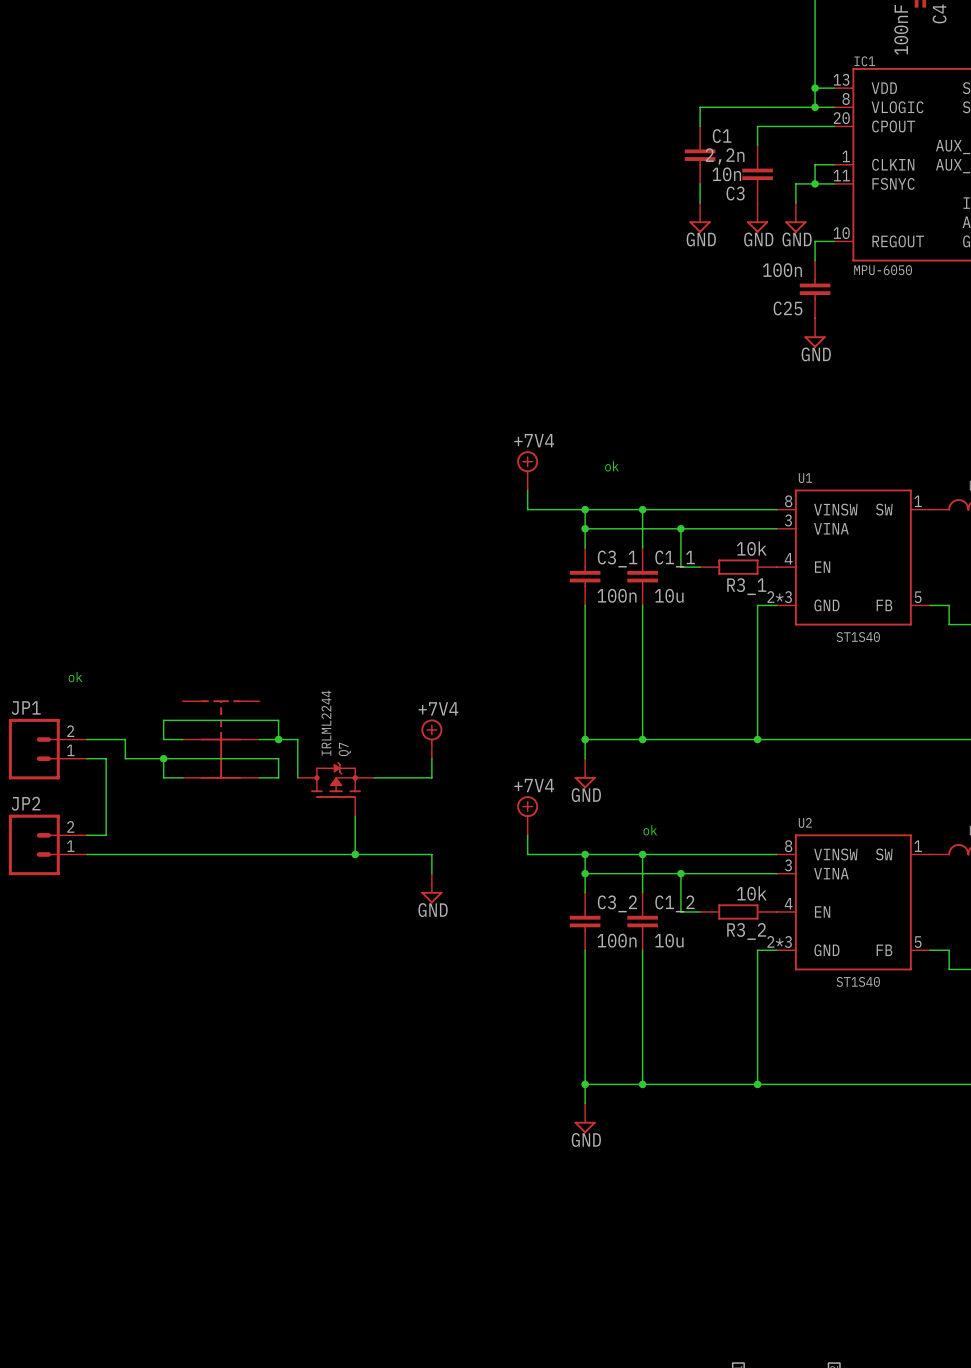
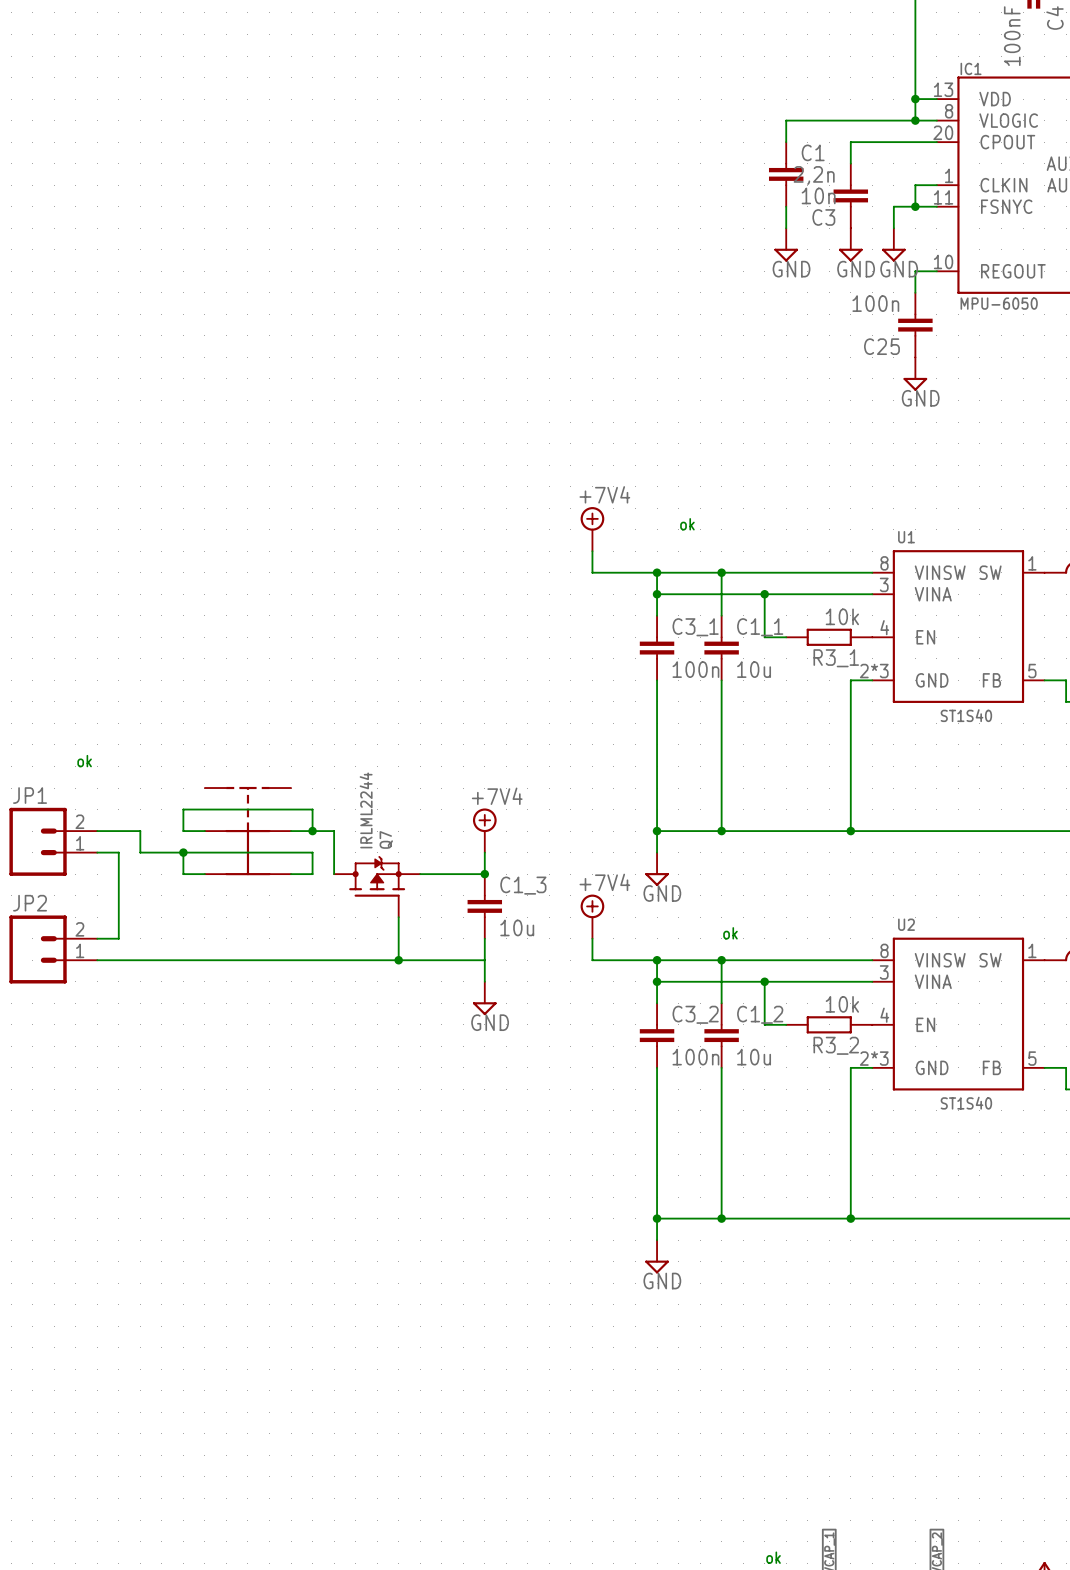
junction: none -> (484, 874)
C1_3: none -> 10u (484, 906)
wire: none -> (484, 938) (484, 960)

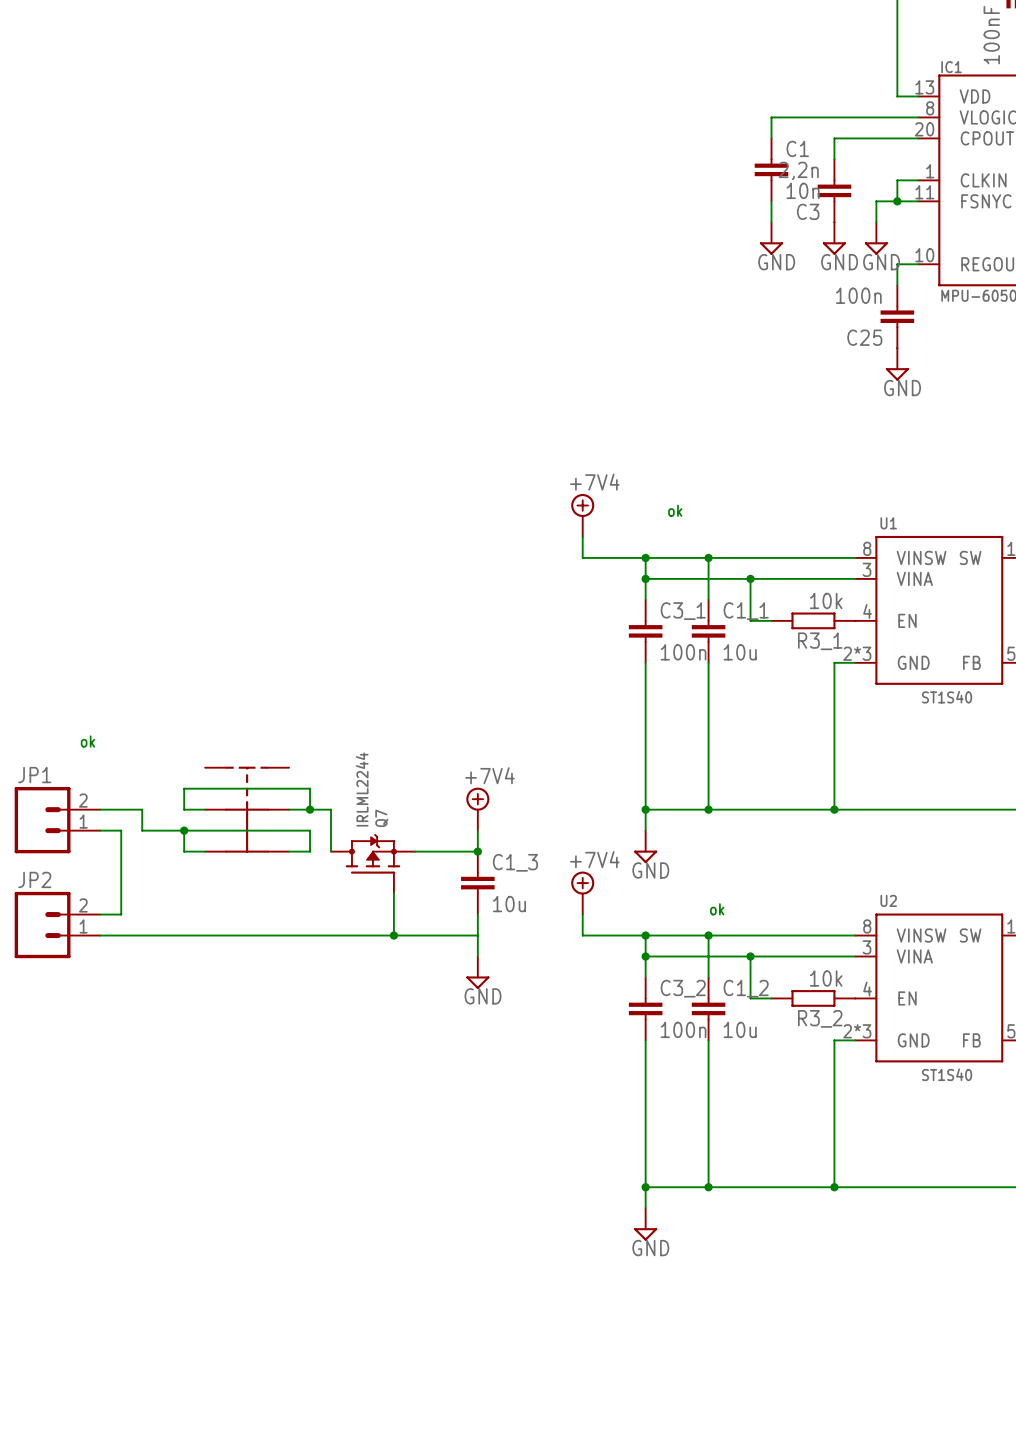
wire: (915, 99) (915, 120) -> none
junction: (915, 99) -> none
junction: (915, 120) -> none

